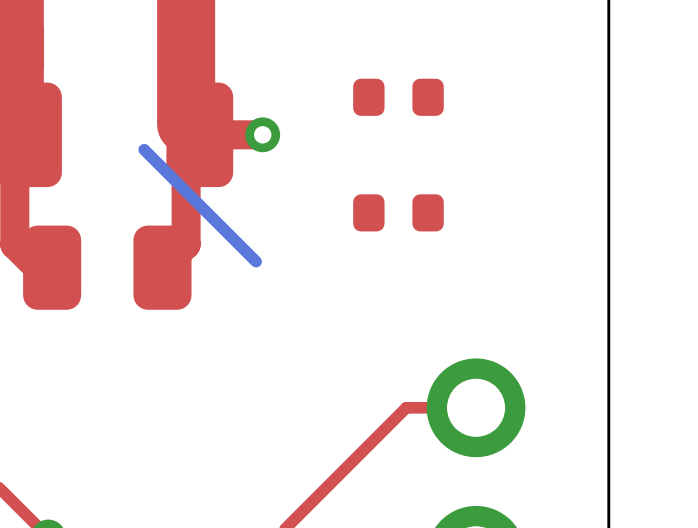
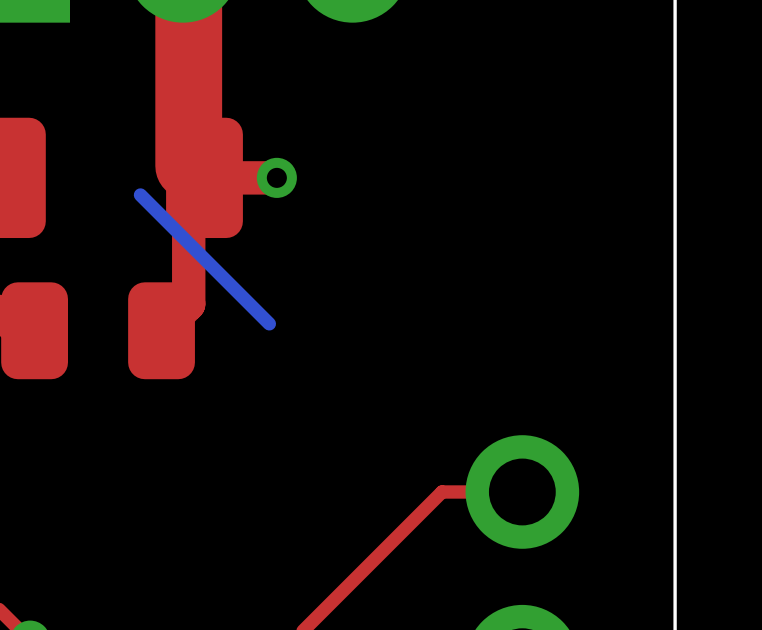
part: (398, 97) -> none
part: (398, 212) -> none

